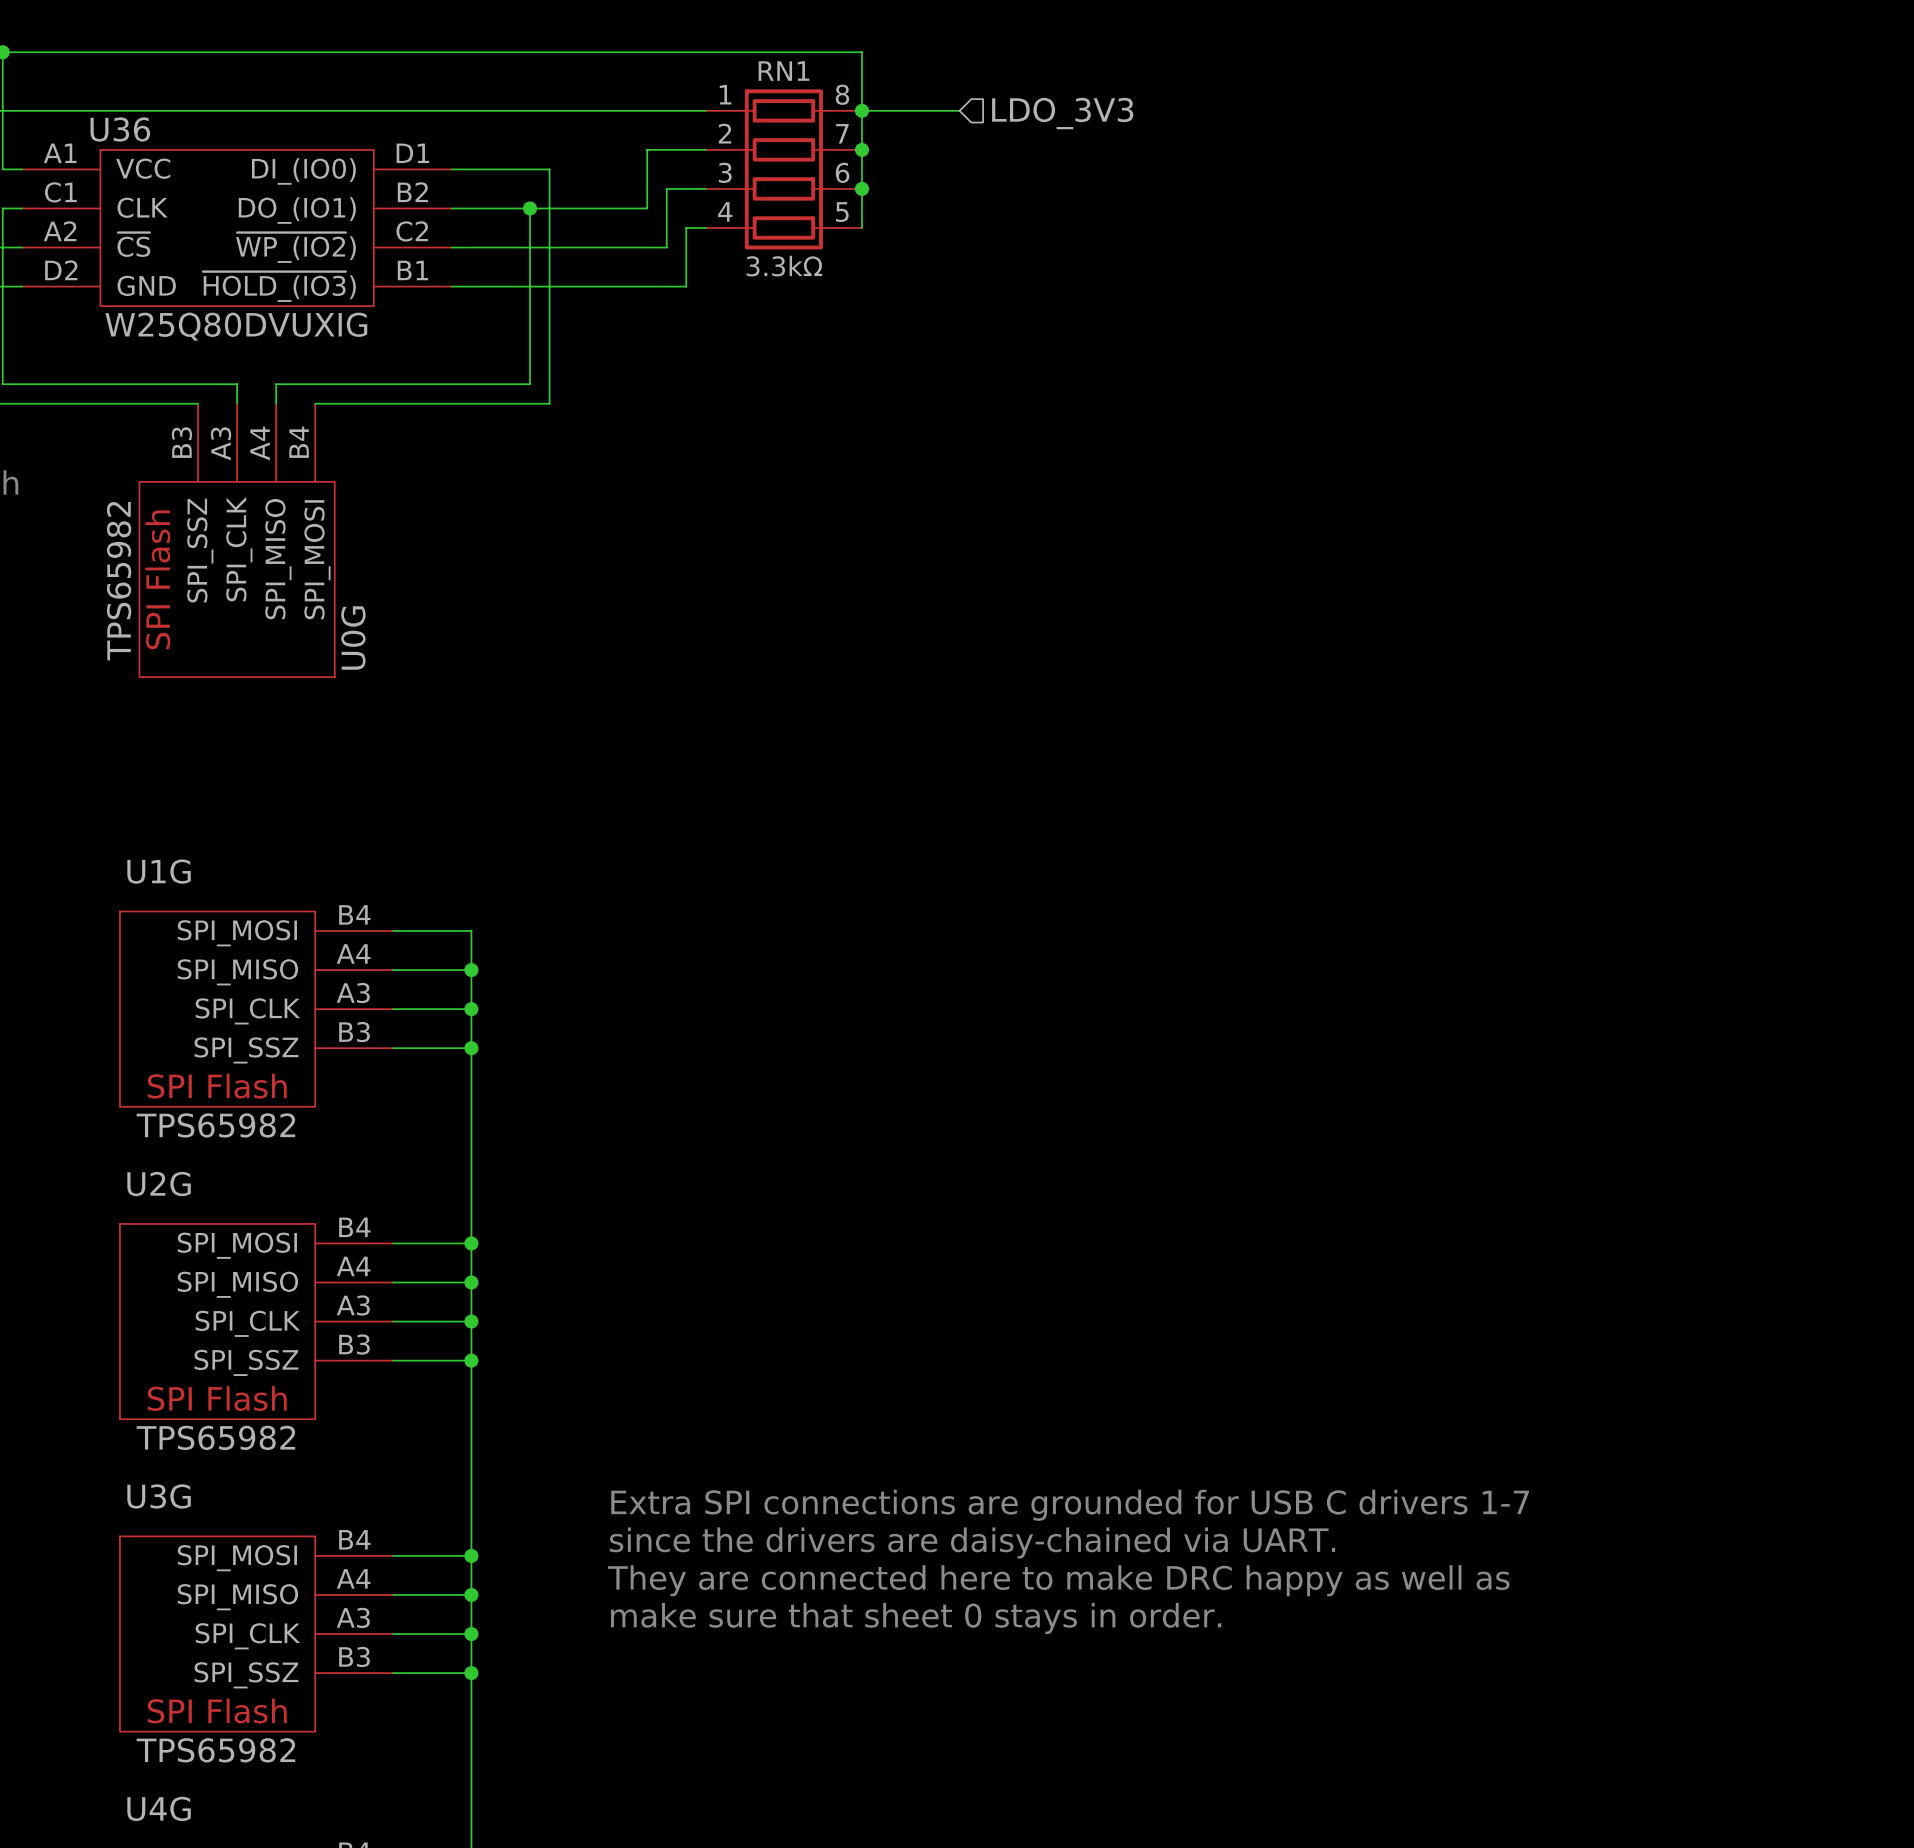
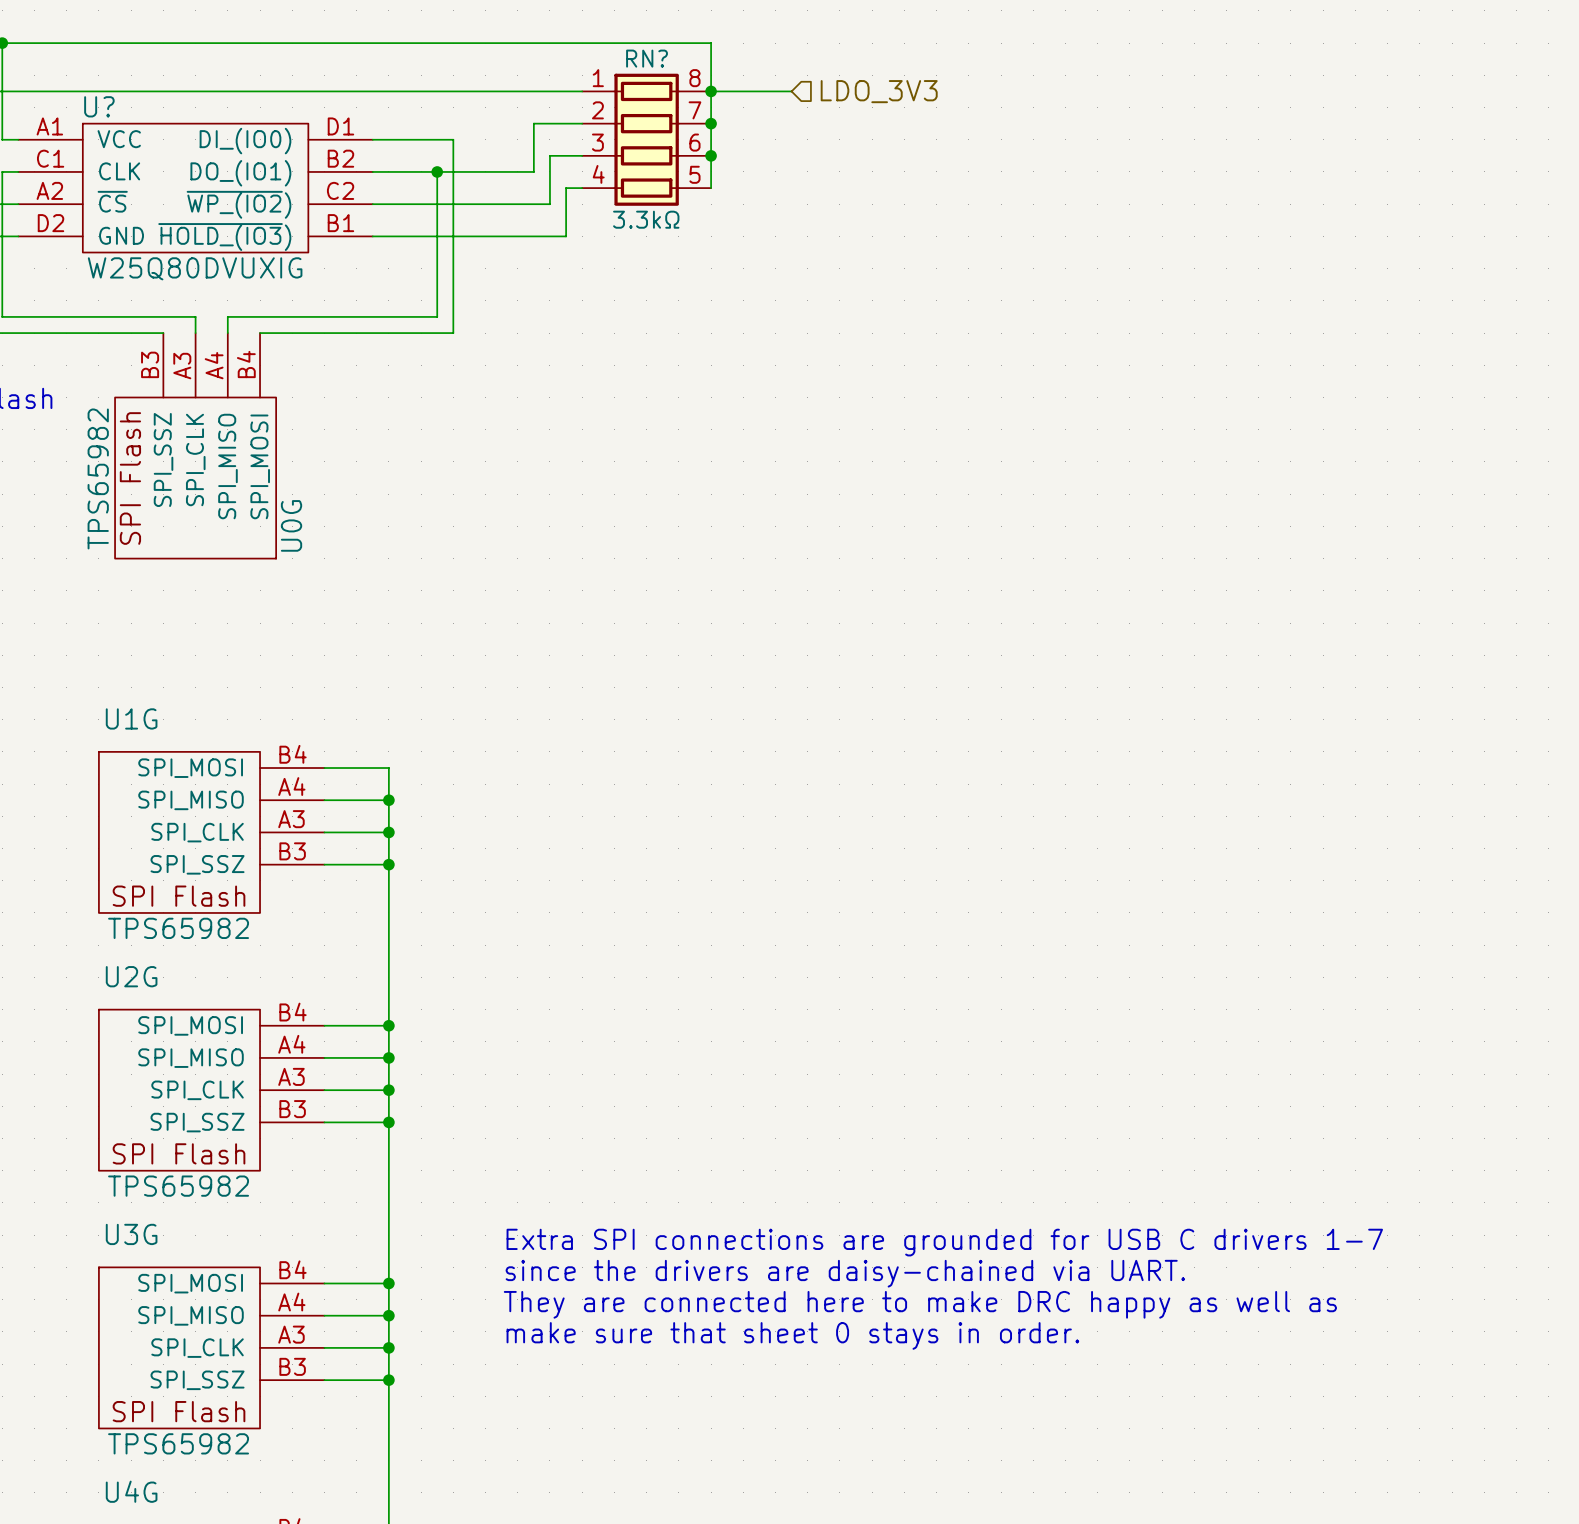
RN1 name: RN1 (783, 71) -> RN? (647, 58)
U36 name: U36 (120, 129) -> U? (99, 106)

